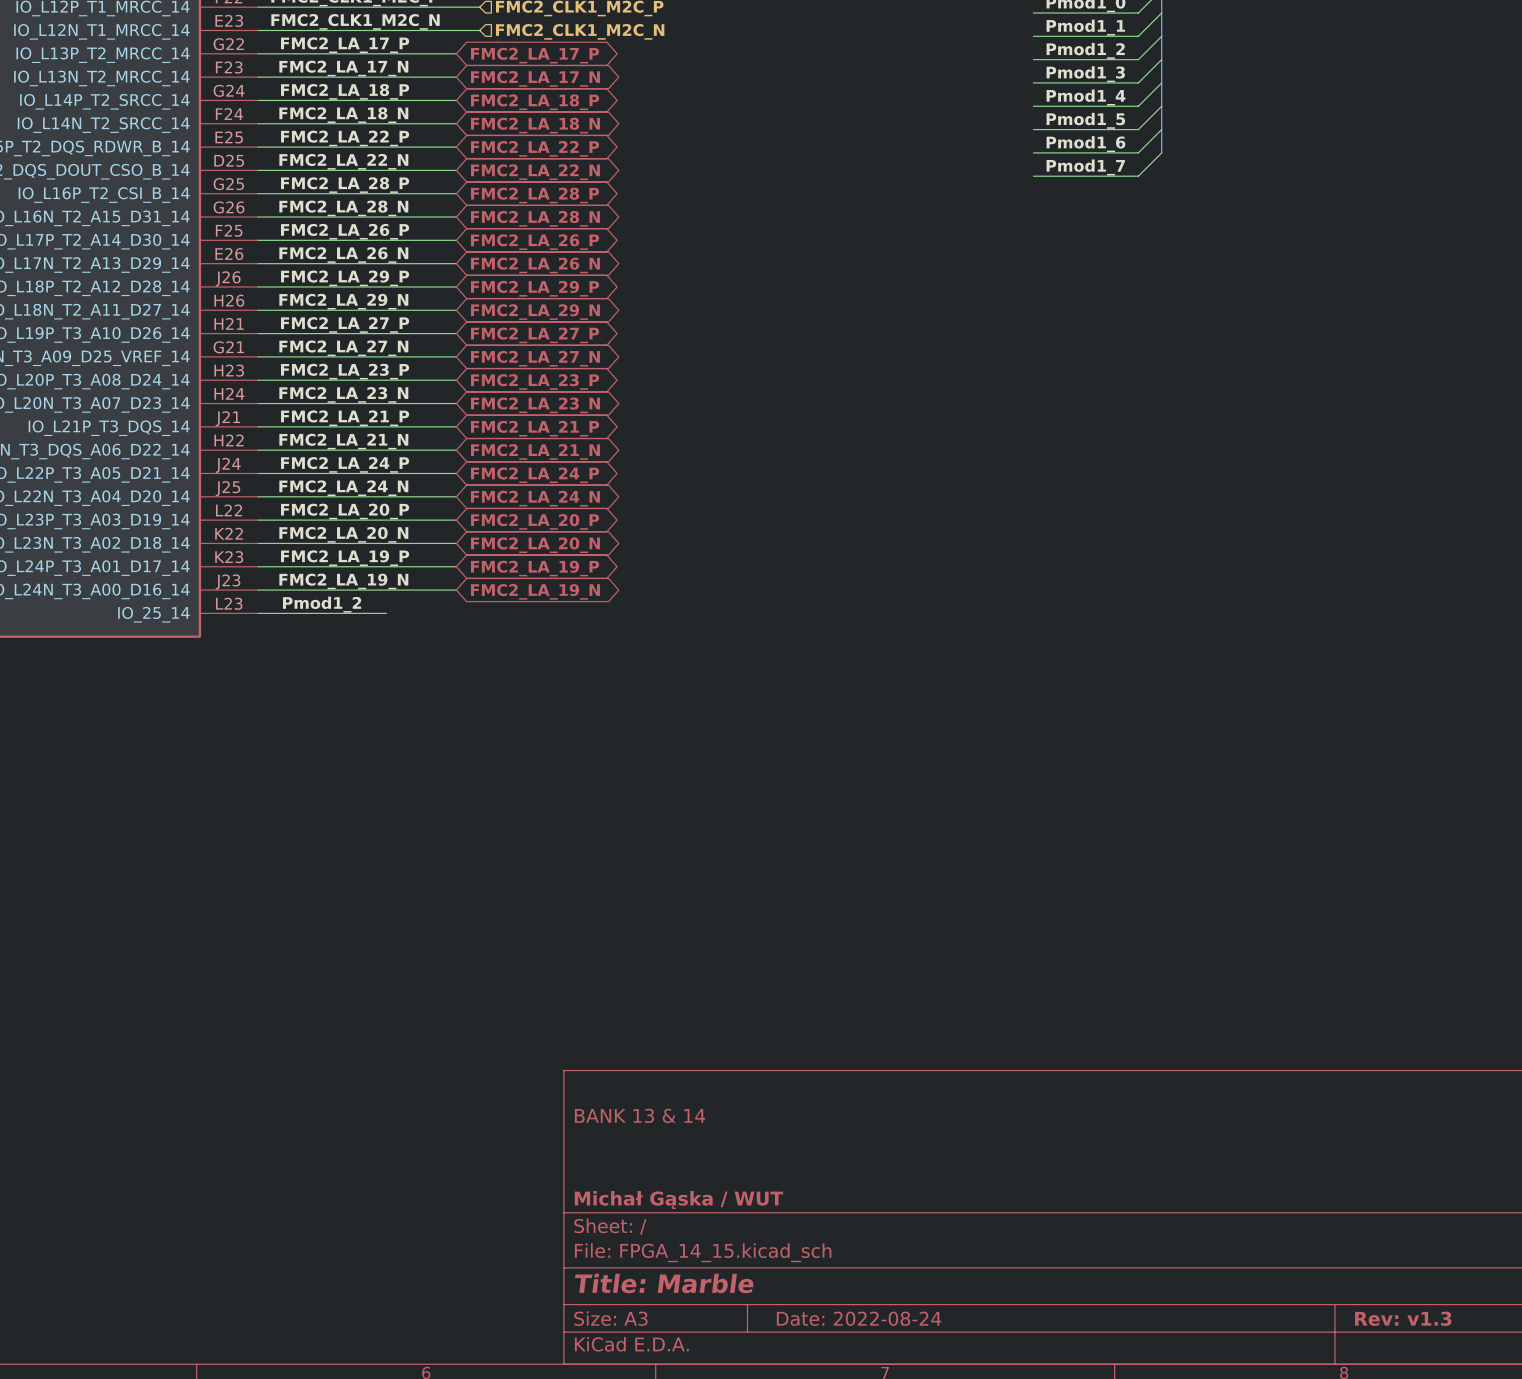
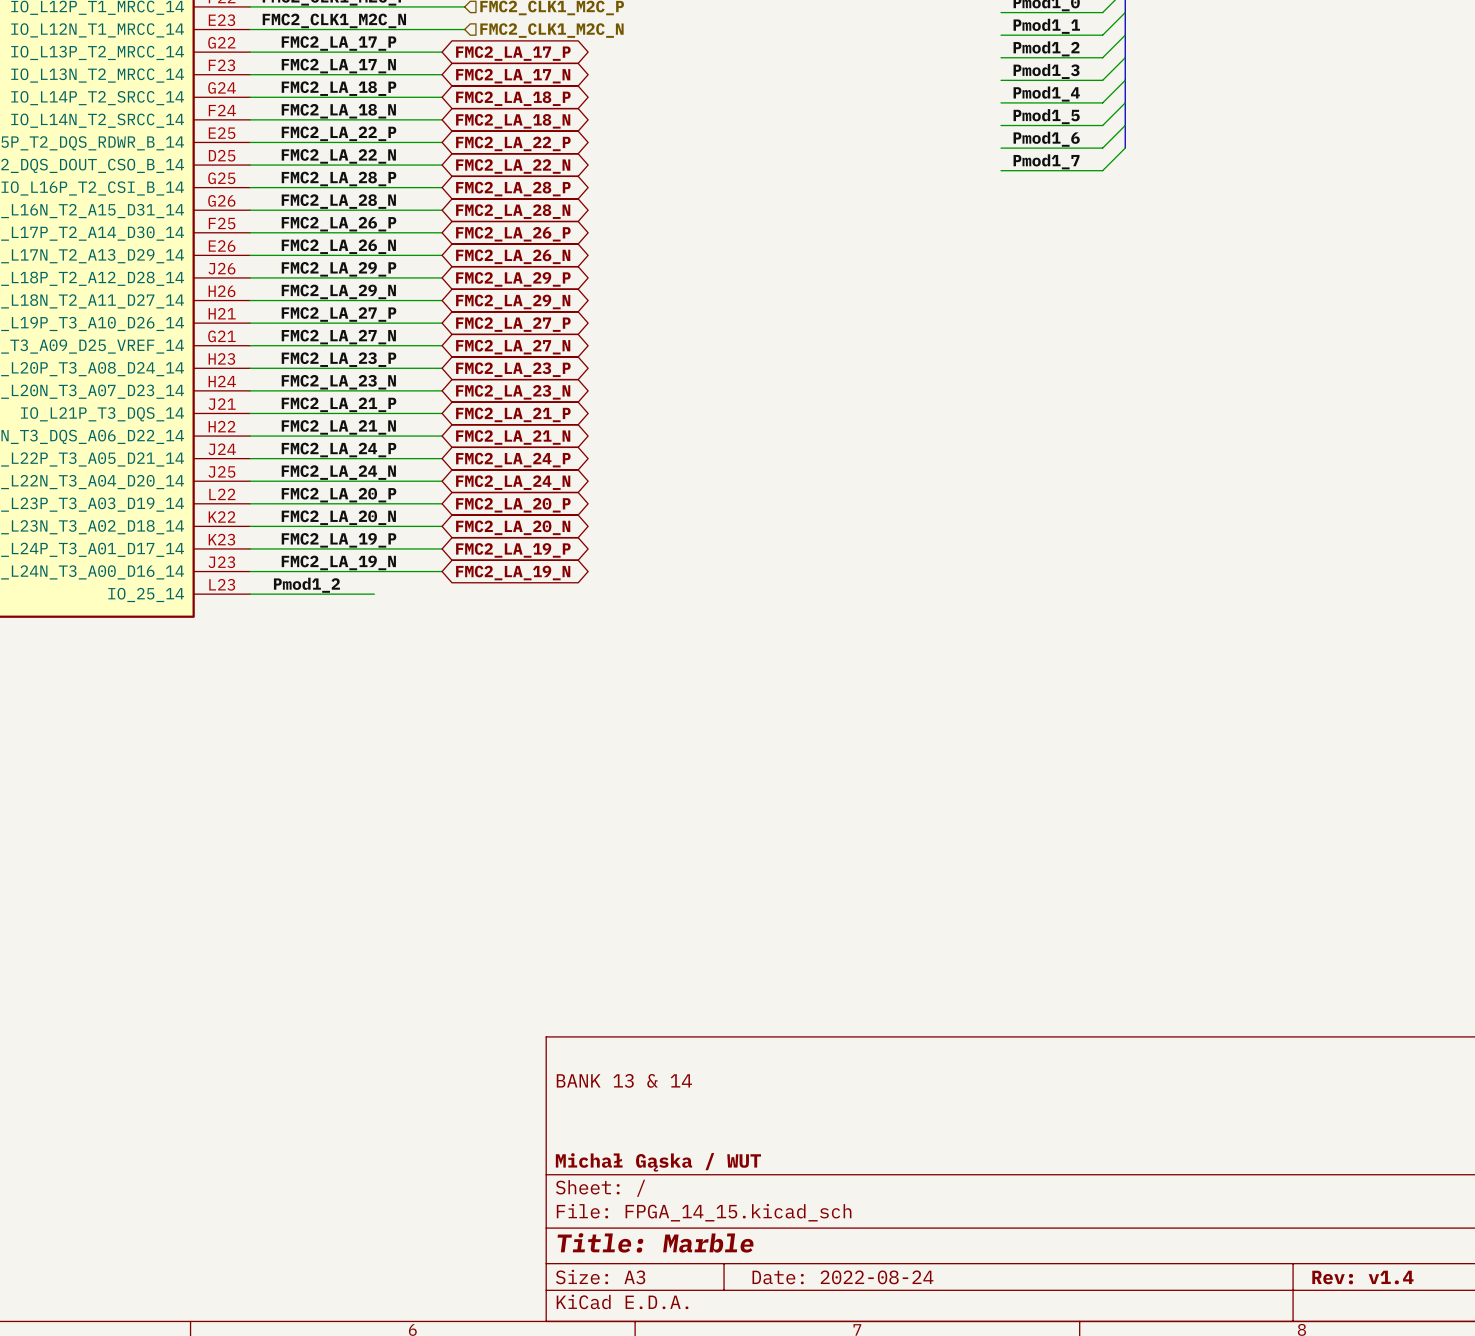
title block: Rev: v1.3 (1403, 1318) -> Rev: v1.4 (1362, 1277)

